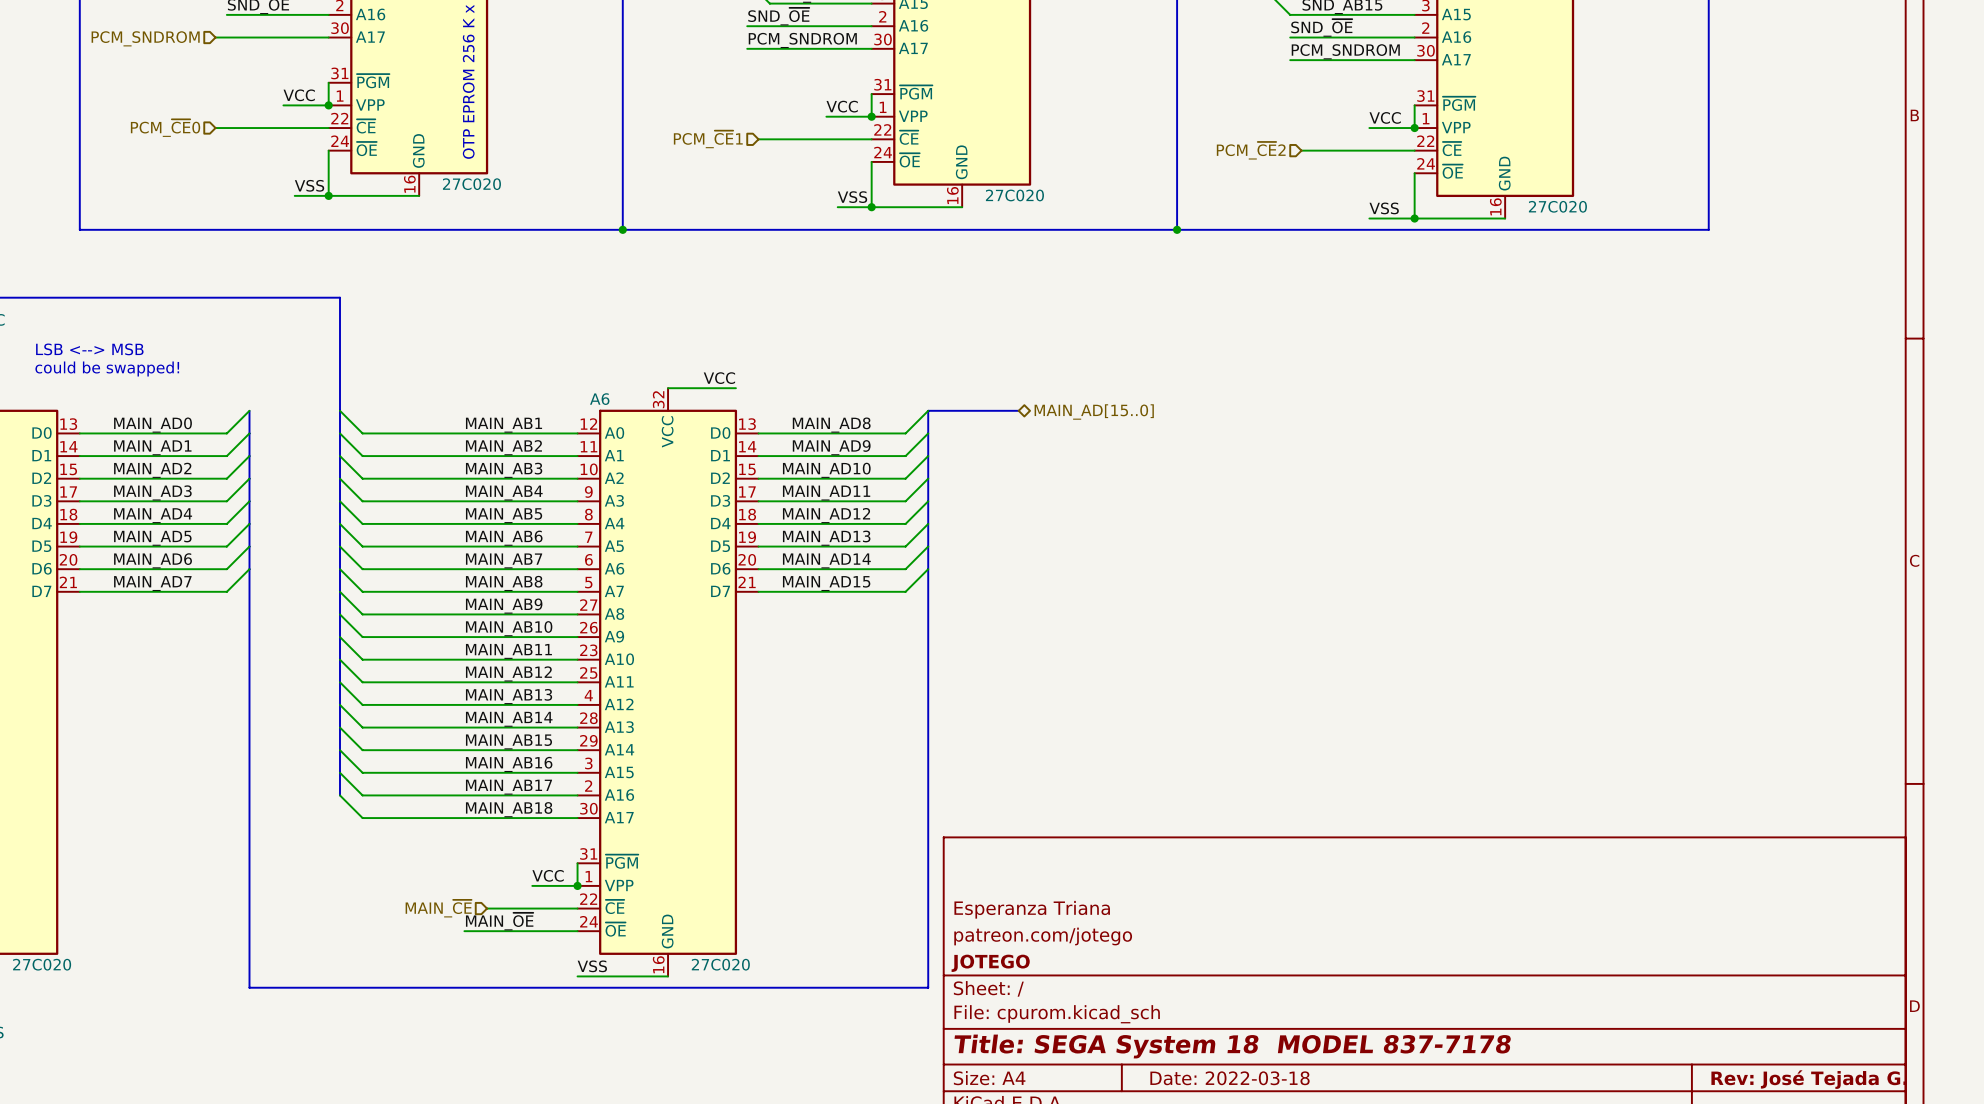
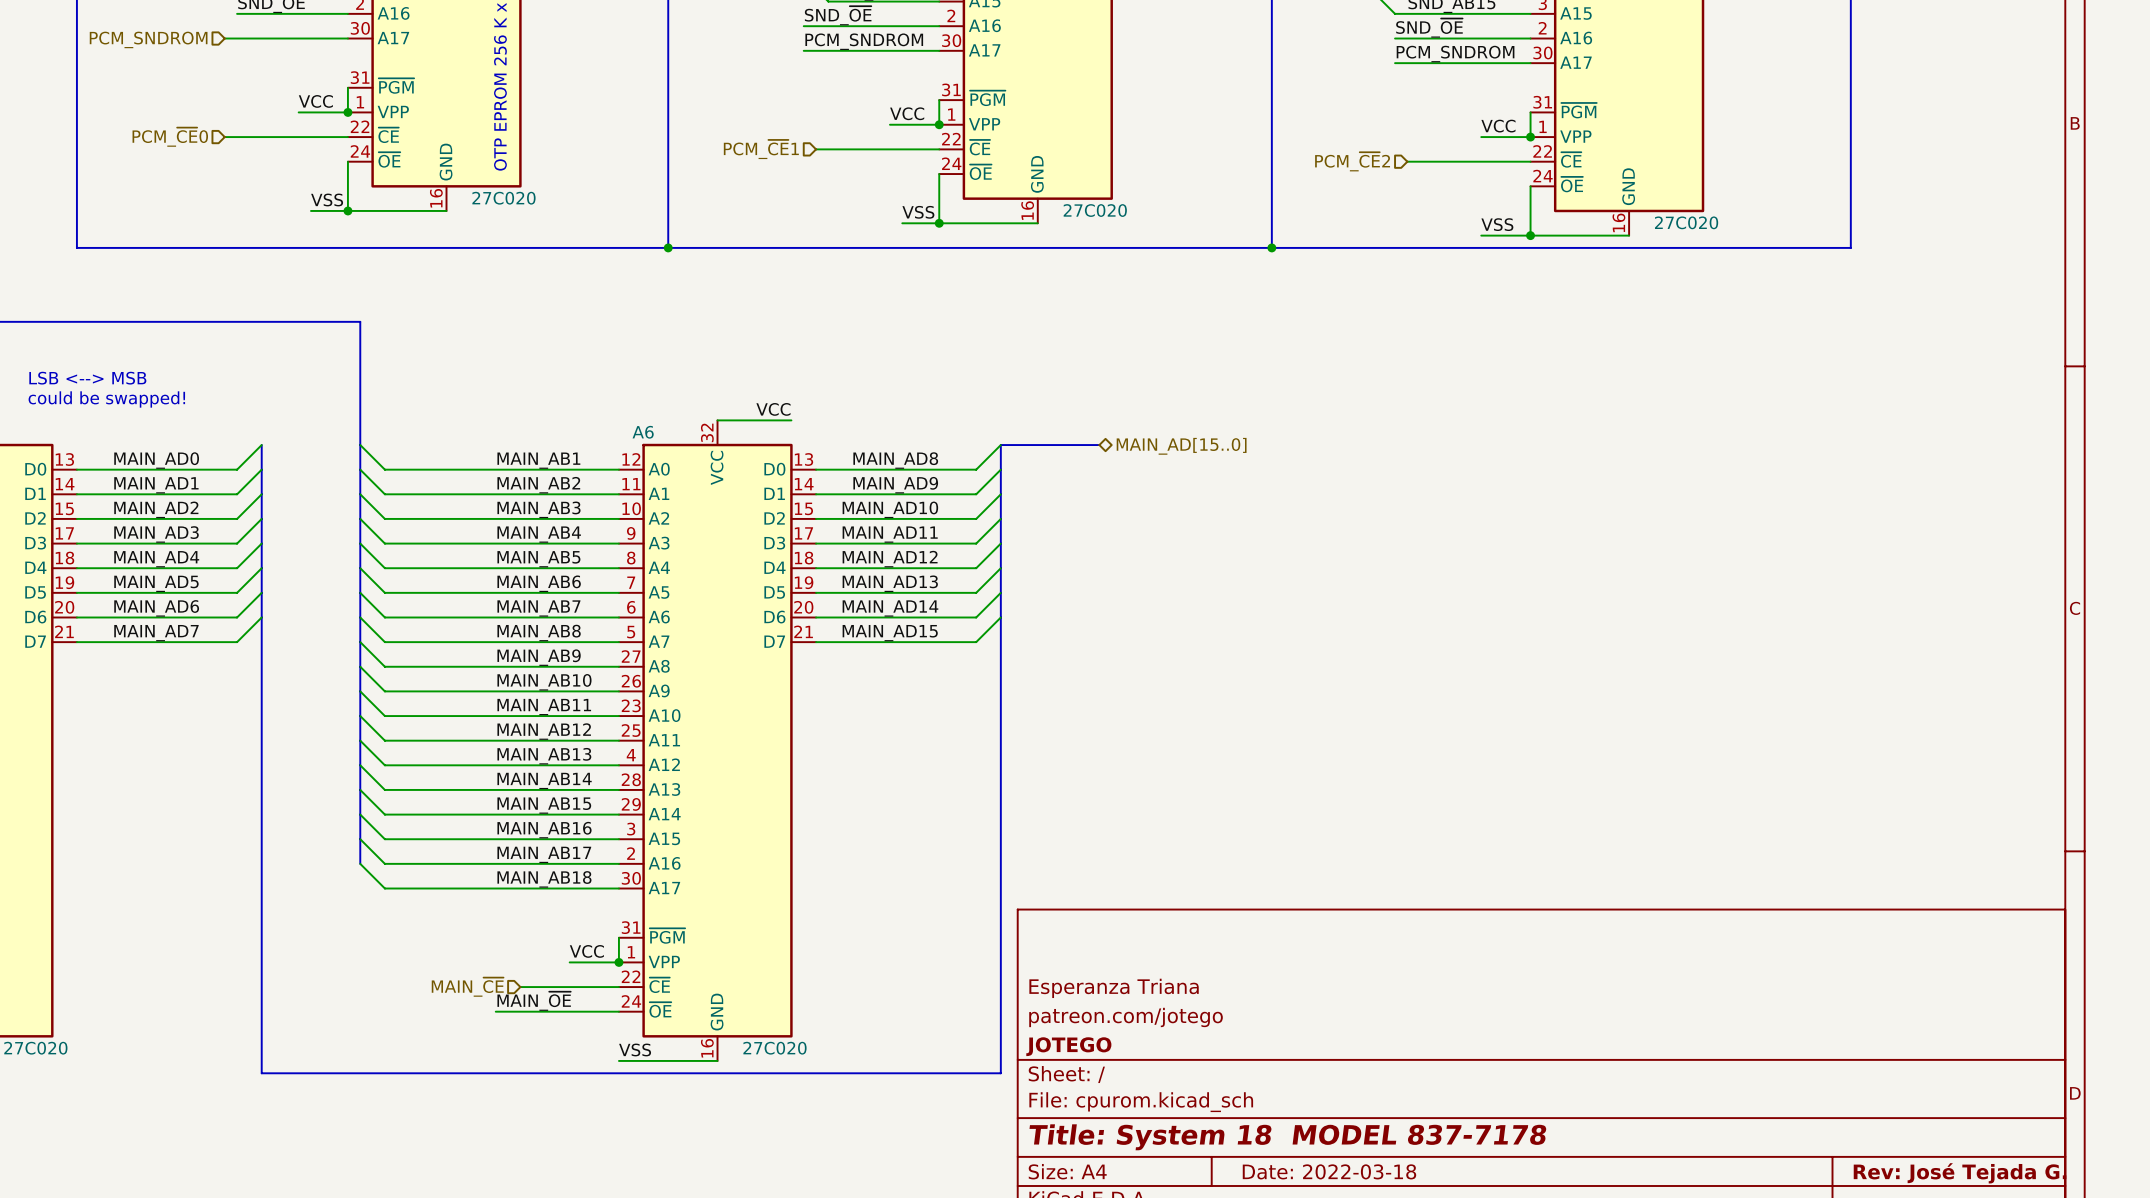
title block: Title: SEGA System 18 MODEL 837-7178 (1232, 1046) -> Title: System 18 MODEL 837-7178 (1287, 1137)

